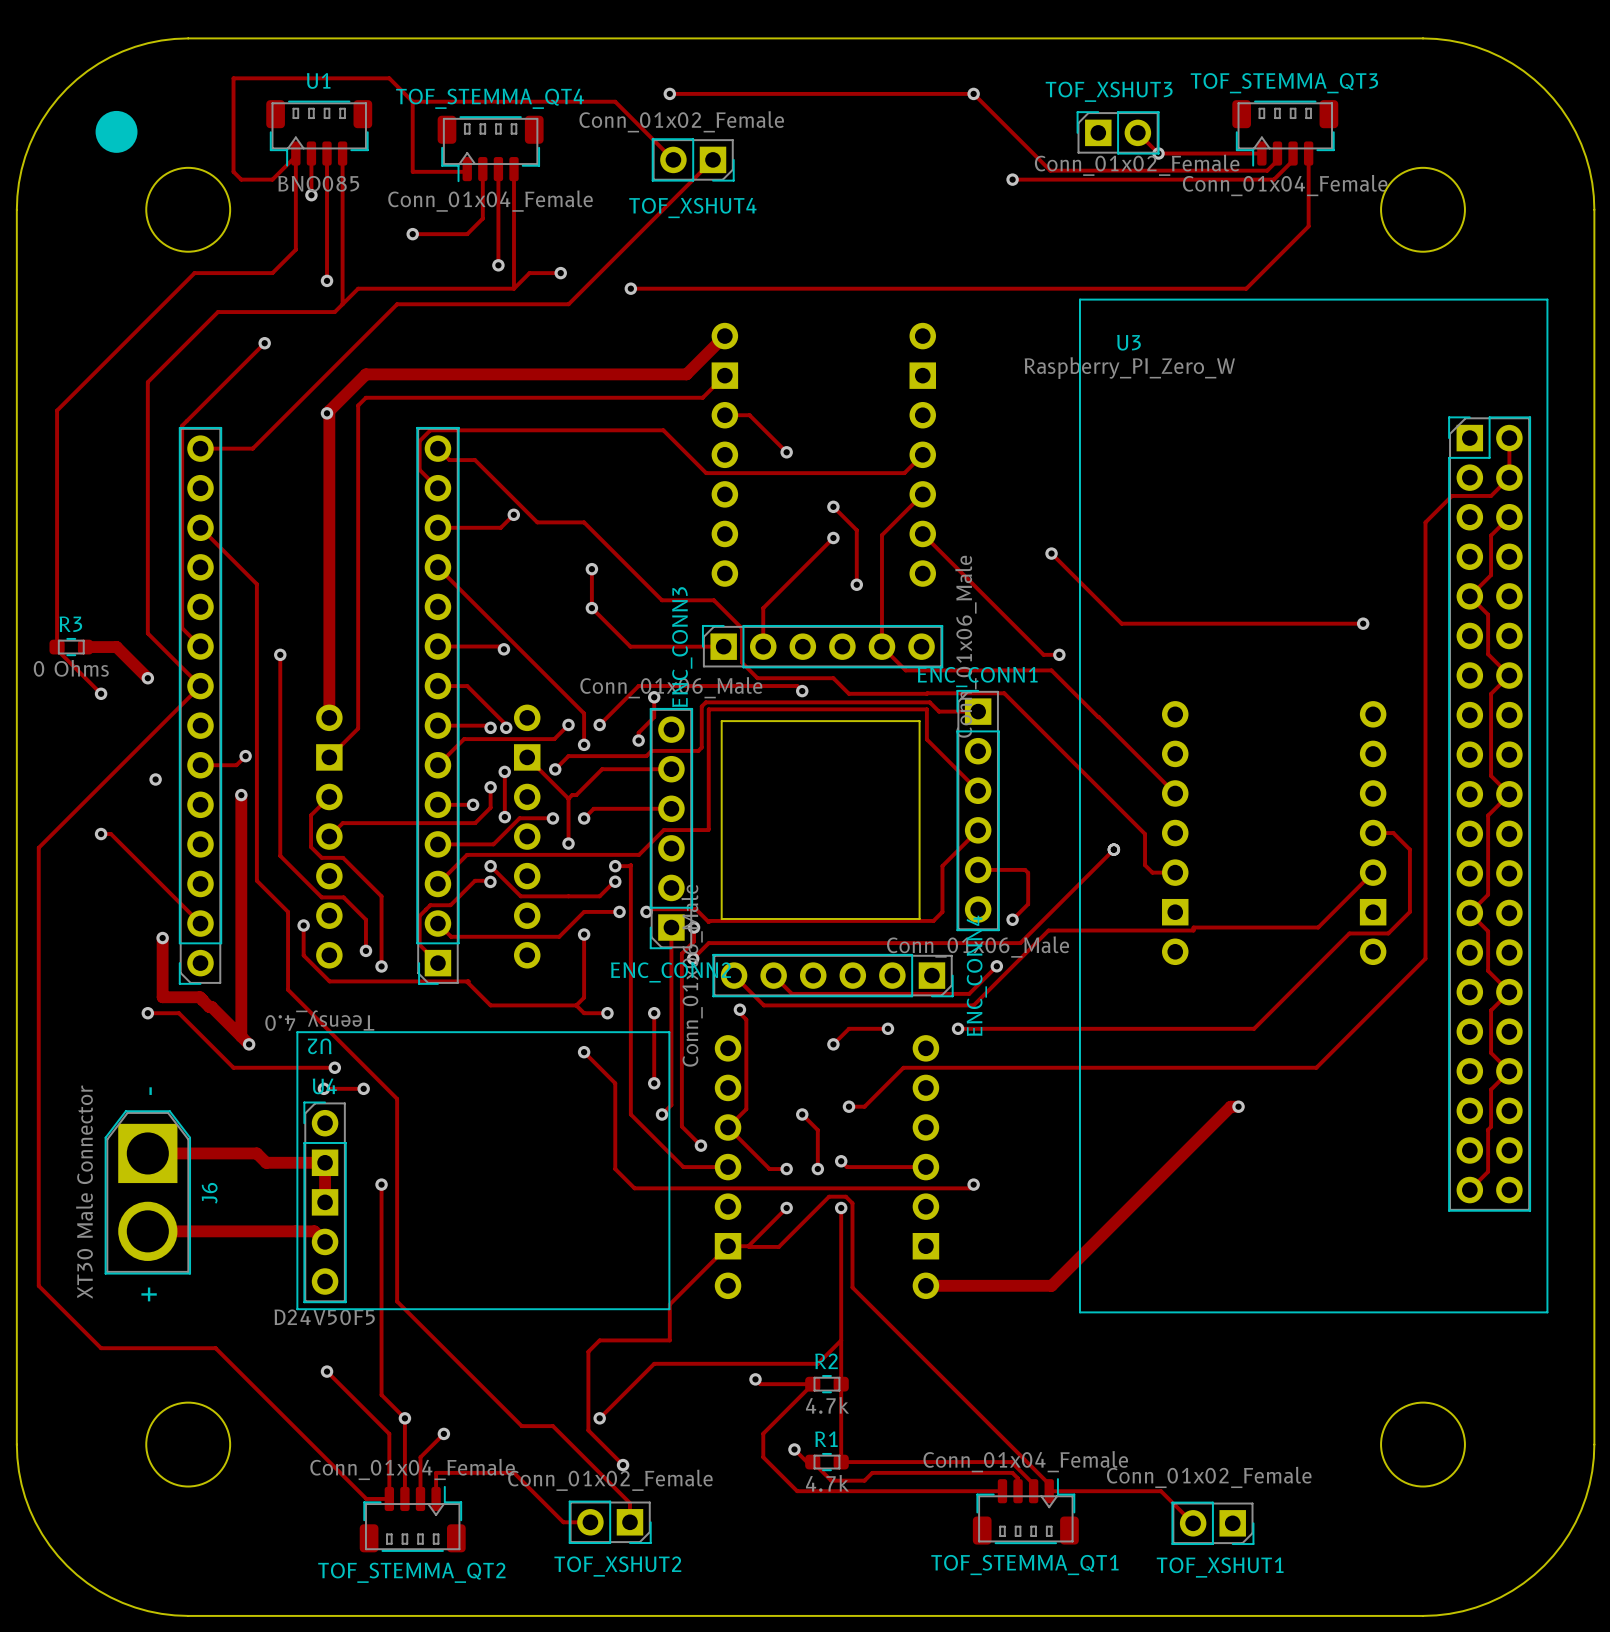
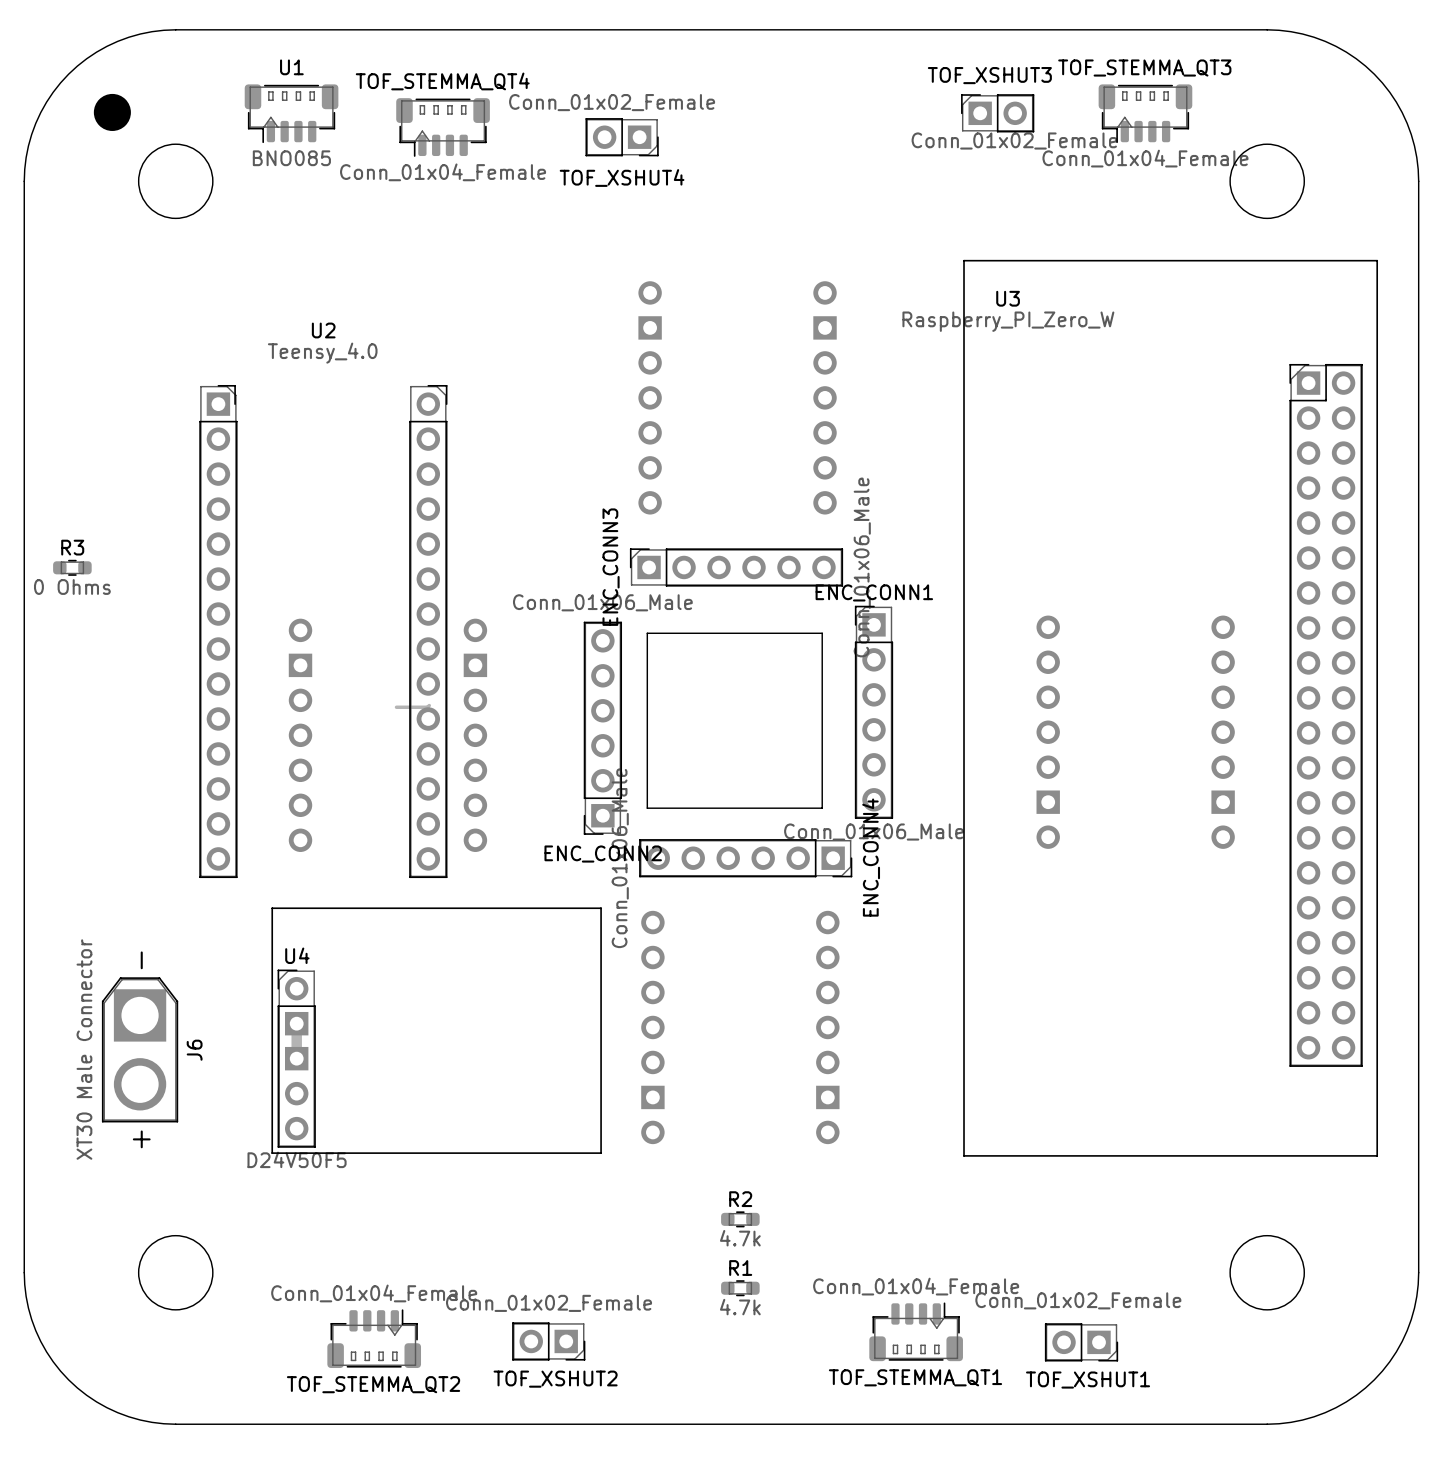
track: (669, 93) (973, 93) (1050, 170) (1267, 170) (1277, 160) (1277, 153) -> none
via: (669, 93) -> none
via: (973, 93) -> none
track: (412, 101) (615, 101) (673, 159) -> none
track: (412, 101) (412, 171) (464, 171) (467, 169) -> none
track: (412, 101) (389, 78) (233, 78) (233, 171) (241, 179) (272, 179) (295, 156) -> none
track: (1137, 132) (1158, 153) (1261, 153) -> none
track: (295, 153) (295, 249) (272, 273) (194, 273) (57, 410) (57, 649) (101, 693) -> none
track: (311, 153) (311, 195) -> none
track: (327, 153) (327, 280) -> none
track: (342, 153) (342, 304) -> none
via: (1158, 153) -> none
track: (1293, 153) (1293, 160) (1273, 179) (1012, 179) -> none
track: (1308, 153) (1308, 226) (1246, 288) (630, 288) -> none
track: (712, 159) (568, 304) (397, 304) (252, 448) (198, 448) (194, 444) -> none
track: (482, 169) (482, 218) (467, 234) (412, 234) -> none
track: (498, 169) (498, 265) -> none
track: (513, 169) (513, 288) -> none
via: (1012, 179) -> none
via: (311, 195) -> none
via: (412, 234) -> none
via: (498, 265) -> none
track: (560, 273) (529, 273) (513, 288) -> none
via: (560, 273) -> none
via: (327, 280) -> none
track: (513, 288) (358, 288) (334, 312) (217, 312) (147, 382) (147, 633) (200, 686) (38, 847) (38, 1285) (101, 1348) (215, 1348) (366, 1498) (389, 1498) (389, 1433) (327, 1371) -> none
via: (630, 288) -> none
track: (724, 336) (686, 374) (365, 374) (329, 411) (329, 717) -> none
track: (264, 343) (182, 425) (182, 628) (200, 646) -> none
via: (264, 343) -> none
track: (724, 375) (702, 397) (365, 397) (358, 405) (358, 728) (329, 757) -> none
via: (327, 413) -> none
track: (724, 415) (749, 415) (786, 452) -> none
track: (1509, 438) (1509, 477) (1491, 495) (1451, 495) (1425, 522) (1425, 958) (1316, 1067) (903, 1067) (864, 1106) (848, 1106) -> none
track: (437, 448) (449, 460) (475, 460) (537, 522) (584, 522) (662, 600) (713, 600) (741, 628) (741, 662) (757, 678) (833, 678) (848, 693) (1004, 693) (1145, 834) (1145, 865) (1152, 872) (1175, 872) -> none
via: (786, 452) -> none
track: (922, 454) (904, 473) (706, 473) (663, 430) (430, 430) (419, 441) (419, 469) (437, 488) -> none
track: (922, 494) (881, 535) (881, 646) (905, 670) (1051, 670) (1175, 793) -> none
track: (833, 506) (856, 530) (856, 584) -> none
via: (833, 506) -> none
track: (513, 514) (500, 527) (437, 527) -> none
via: (513, 514) -> none
track: (1509, 517) (1491, 535) (1491, 575) (1469, 596) (1488, 614) (1488, 654) (1509, 675) (1491, 693) (1491, 775) (1509, 794) (1488, 815) (1488, 894) (1469, 913) (1488, 931) (1488, 970) (1509, 992) (1491, 1010) (1491, 1053) (1509, 1071) (1491, 1089) (1491, 1126) (1487, 1130) (1488, 1171) (1469, 1190) -> none
track: (200, 527) (256, 584) (256, 880) (288, 911) (288, 989) (397, 1098) (397, 1301) (521, 1426) (552, 1426) (629, 1503) (629, 1522) -> none
track: (922, 533) (1043, 654) (1059, 654) -> none
track: (833, 537) (763, 608) (763, 646) -> none
via: (833, 537) -> none
track: (1051, 553) (1121, 623) (1363, 623) -> none
via: (1051, 553) -> none
track: (437, 567) (584, 713) (584, 744) -> none
track: (591, 569) (591, 608) (630, 646) (723, 646) -> none
via: (591, 569) -> none
via: (856, 584) -> none
via: (591, 608) -> none
via: (1363, 623) -> none
track: (437, 646) (501, 646) (503, 649) -> none
track: (85, 647) (116, 647) (147, 678) -> none
via: (503, 649) -> none
track: (280, 654) (280, 855) (321, 897) (343, 897) (365, 919) (365, 950) -> none
via: (280, 654) -> none
via: (1059, 654) -> none
via: (147, 678) -> none
track: (437, 686) (467, 686) (506, 724) (506, 727) -> none
track: (802, 691) (797, 686) (638, 686) (599, 724) -> none
via: (802, 691) -> none
via: (101, 693) -> none
track: (654, 697) (654, 717) (638, 732) (638, 740) -> none
via: (654, 697) -> none
U2 rotation: 0° (319, 705) -> 180° (323, 631)
track: (978, 711) (939, 711) (929, 702) (705, 702) (701, 706) (701, 747) (698, 750) (651, 750) (646, 756) (568, 756) (555, 769) -> none
track: (568, 724) (554, 739) (464, 739) (437, 765) -> none
via: (568, 724) -> none
via: (599, 724) -> none
track: (437, 725) (488, 725) (490, 727) -> none
via: (490, 727) -> none
via: (506, 727) -> none
via: (638, 740) -> none
via: (584, 744) -> none
track: (245, 756) (236, 765) (200, 765) -> none
via: (245, 756) -> none
track: (527, 757) (568, 798) -> none
via: (555, 769) -> none
track: (671, 769) (602, 769) (576, 795) (572, 795) (568, 798) -> none
via: (504, 771) -> none
track: (504, 772) (504, 817) -> none
via: (155, 779) -> none
track: (490, 787) (490, 807) (475, 823) (342, 823) (329, 836) -> none
via: (490, 787) -> none
track: (978, 790) (926, 739) (926, 709) (708, 709) (708, 830) (663, 830) (639, 854) (467, 854) (437, 883) -> none
track: (241, 795) (241, 1036) -> none
via: (241, 795) -> none
track: (329, 796) (311, 815) (311, 847) (321, 857) (343, 857) (381, 896) (381, 966) -> none
track: (568, 798) (568, 843) -> none
via: (473, 804) -> none
track: (671, 808) (593, 808) (584, 818) -> none
via: (504, 817) -> none
track: (552, 818) (519, 818) (493, 844) (437, 844) -> none
via: (552, 818) -> none
via: (584, 818) -> none
track: (978, 830) (942, 866) (942, 911) (933, 920) (708, 922) (695, 909) (649, 909) (646, 911) -> none
track: (1373, 833) (1393, 833) (1409, 849) (1409, 911) (1388, 933) (1349, 933) (1254, 1028) (958, 1028) -> none
track: (101, 834) (110, 834) (200, 923) -> none
via: (101, 834) -> none
via: (568, 843) -> none
track: (1113, 849) (1020, 943) (708, 943) (693, 958) -> none
via: (1113, 849) -> none
track: (490, 866) (520, 896) (599, 896) (615, 881) -> none
via: (490, 866) -> none
track: (615, 866) (630, 865) (630, 1114) (683, 1167) (728, 1167) -> none
via: (615, 866) -> none
track: (978, 869) (1025, 869) (1028, 872) (1028, 904) (1012, 919) -> none
track: (1373, 872) (1318, 927) (1193, 927) (1193, 930) (1048, 930) (973, 1005) (763, 1005) (734, 975) -> none
track: (490, 881) (475, 880) (450, 905) (430, 905) (419, 915) (419, 944) (437, 963) -> none
via: (490, 881) -> none
via: (615, 881) -> none
track: (619, 911) (584, 911) (559, 936) (451, 936) (437, 923) -> none
via: (619, 911) -> none
via: (646, 911) -> none
via: (1012, 919) -> none
track: (303, 925) (303, 955) (329, 981) (468, 981) -> none
via: (303, 925) -> none
track: (671, 927) (671, 1105) (662, 1114) -> none
track: (694, 927) (694, 941) (681, 953) (681, 1126) (700, 1145) -> none
via: (694, 927) -> none
track: (584, 934) (584, 997) (576, 1005) -> none
via: (584, 934) -> none
track: (162, 938) (162, 997) (200, 997) (249, 1044) -> none
via: (162, 938) -> none
via: (365, 950) -> none
via: (693, 958) -> none
via: (381, 966) -> none
track: (996, 966) (969, 993) (791, 993) (773, 975) -> none
via: (996, 966) -> none
track: (467, 981) (490, 1005) (576, 1005) -> none
track: (576, 1005) (584, 1013) (607, 1013) -> none
track: (739, 1009) (739, 1013) (746, 1019) (746, 1109) (728, 1127) (769, 1169) (786, 1169) -> none
via: (739, 1009) -> none
track: (147, 1013) (178, 1013) (233, 1067) (334, 1067) -> none
via: (147, 1013) -> none
via: (607, 1013) -> none
track: (654, 1013) (654, 1083) -> none
via: (654, 1013) -> none
track: (887, 1028) (848, 1028) (833, 1044) -> none
via: (887, 1028) -> none
via: (958, 1028) -> none
via: (249, 1044) -> none
via: (833, 1044) -> none
track: (584, 1052) (615, 1083) (615, 1169) (634, 1188) (969, 1188) (973, 1184) -> none
via: (584, 1052) -> none
via: (334, 1067) -> none
via: (654, 1083) -> none
track: (323, 1088) (363, 1088) (365, 1091) -> none
via: (323, 1088) -> none
via: (363, 1088) -> none
via: (848, 1106) -> none
track: (1238, 1106) (1230, 1106) (1051, 1285) (925, 1285) -> none
via: (1238, 1106) -> none
via: (662, 1114) -> none
track: (802, 1114) (817, 1130) (817, 1169) -> none
via: (802, 1114) -> none
via: (700, 1145) -> none
track: (147, 1153) (256, 1153) (266, 1162) (325, 1162) (315, 1153) -> none
track: (841, 1161) (847, 1167) (925, 1167) -> none
via: (841, 1161) -> none
via: (786, 1169) -> none
via: (817, 1169) -> none
track: (381, 1184) (381, 1394) (404, 1418) (404, 1498) -> none
via: (381, 1184) -> none
via: (973, 1184) -> none
track: (786, 1207) (748, 1246) -> none
via: (786, 1207) -> none
track: (841, 1207) (841, 1462) (1011, 1462) (1033, 1484) (1033, 1491) -> none
via: (841, 1207) -> none
track: (147, 1231) (314, 1231) (325, 1241) -> none
track: (748, 1246) (728, 1246) (669, 1304) (669, 1340) (599, 1340) (588, 1351) (588, 1430) (623, 1465) -> none
track: (748, 1246) (778, 1246) (829, 1196) (845, 1196) (852, 1203) (852, 1287) (1049, 1484) (1049, 1491) (1161, 1491) (1193, 1523) -> none
track: (841, 1340) (817, 1363) (654, 1363) (599, 1418) -> none
via: (327, 1371) -> none
track: (755, 1379) (760, 1384) (812, 1384) (763, 1433) (763, 1457) (797, 1491) (1002, 1491) -> none
via: (755, 1379) -> none
via: (404, 1418) -> none
via: (599, 1418) -> none
track: (443, 1433) (420, 1457) (420, 1498) -> none
via: (443, 1433) -> none
track: (794, 1449) (807, 1462) (812, 1462) (831, 1480) (864, 1480) (872, 1472) (1012, 1472) (1018, 1478) (1018, 1491) -> none
via: (794, 1449) -> none
via: (623, 1465) -> none
track: (436, 1498) (436, 1472) (513, 1472) (563, 1522) (590, 1522) -> none

